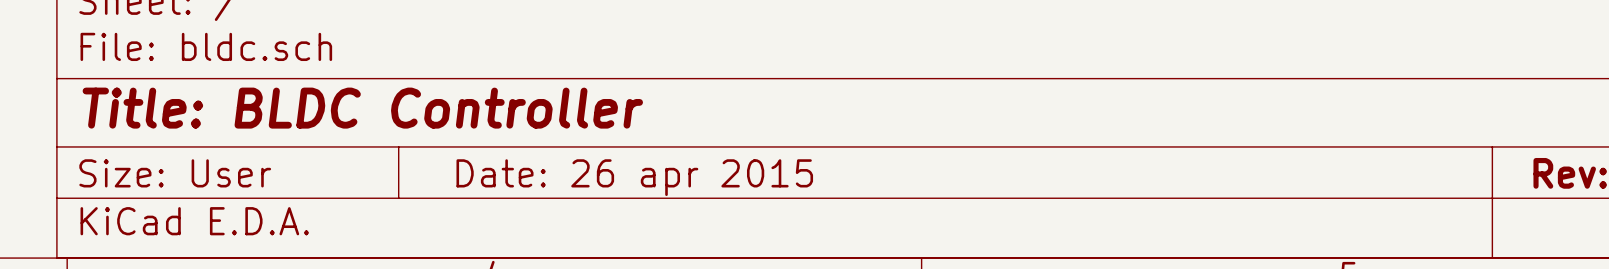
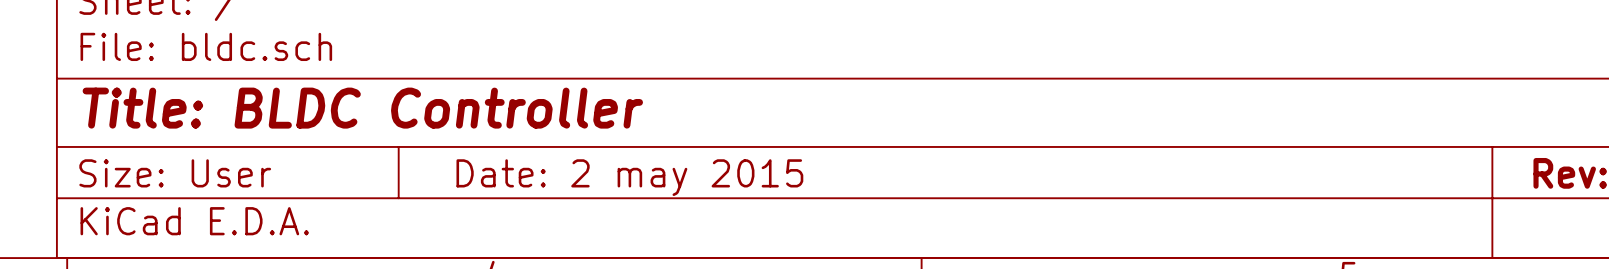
title block: Date: 26 apr 2015 (634, 177) -> Date: 2 may 2015 (629, 177)

